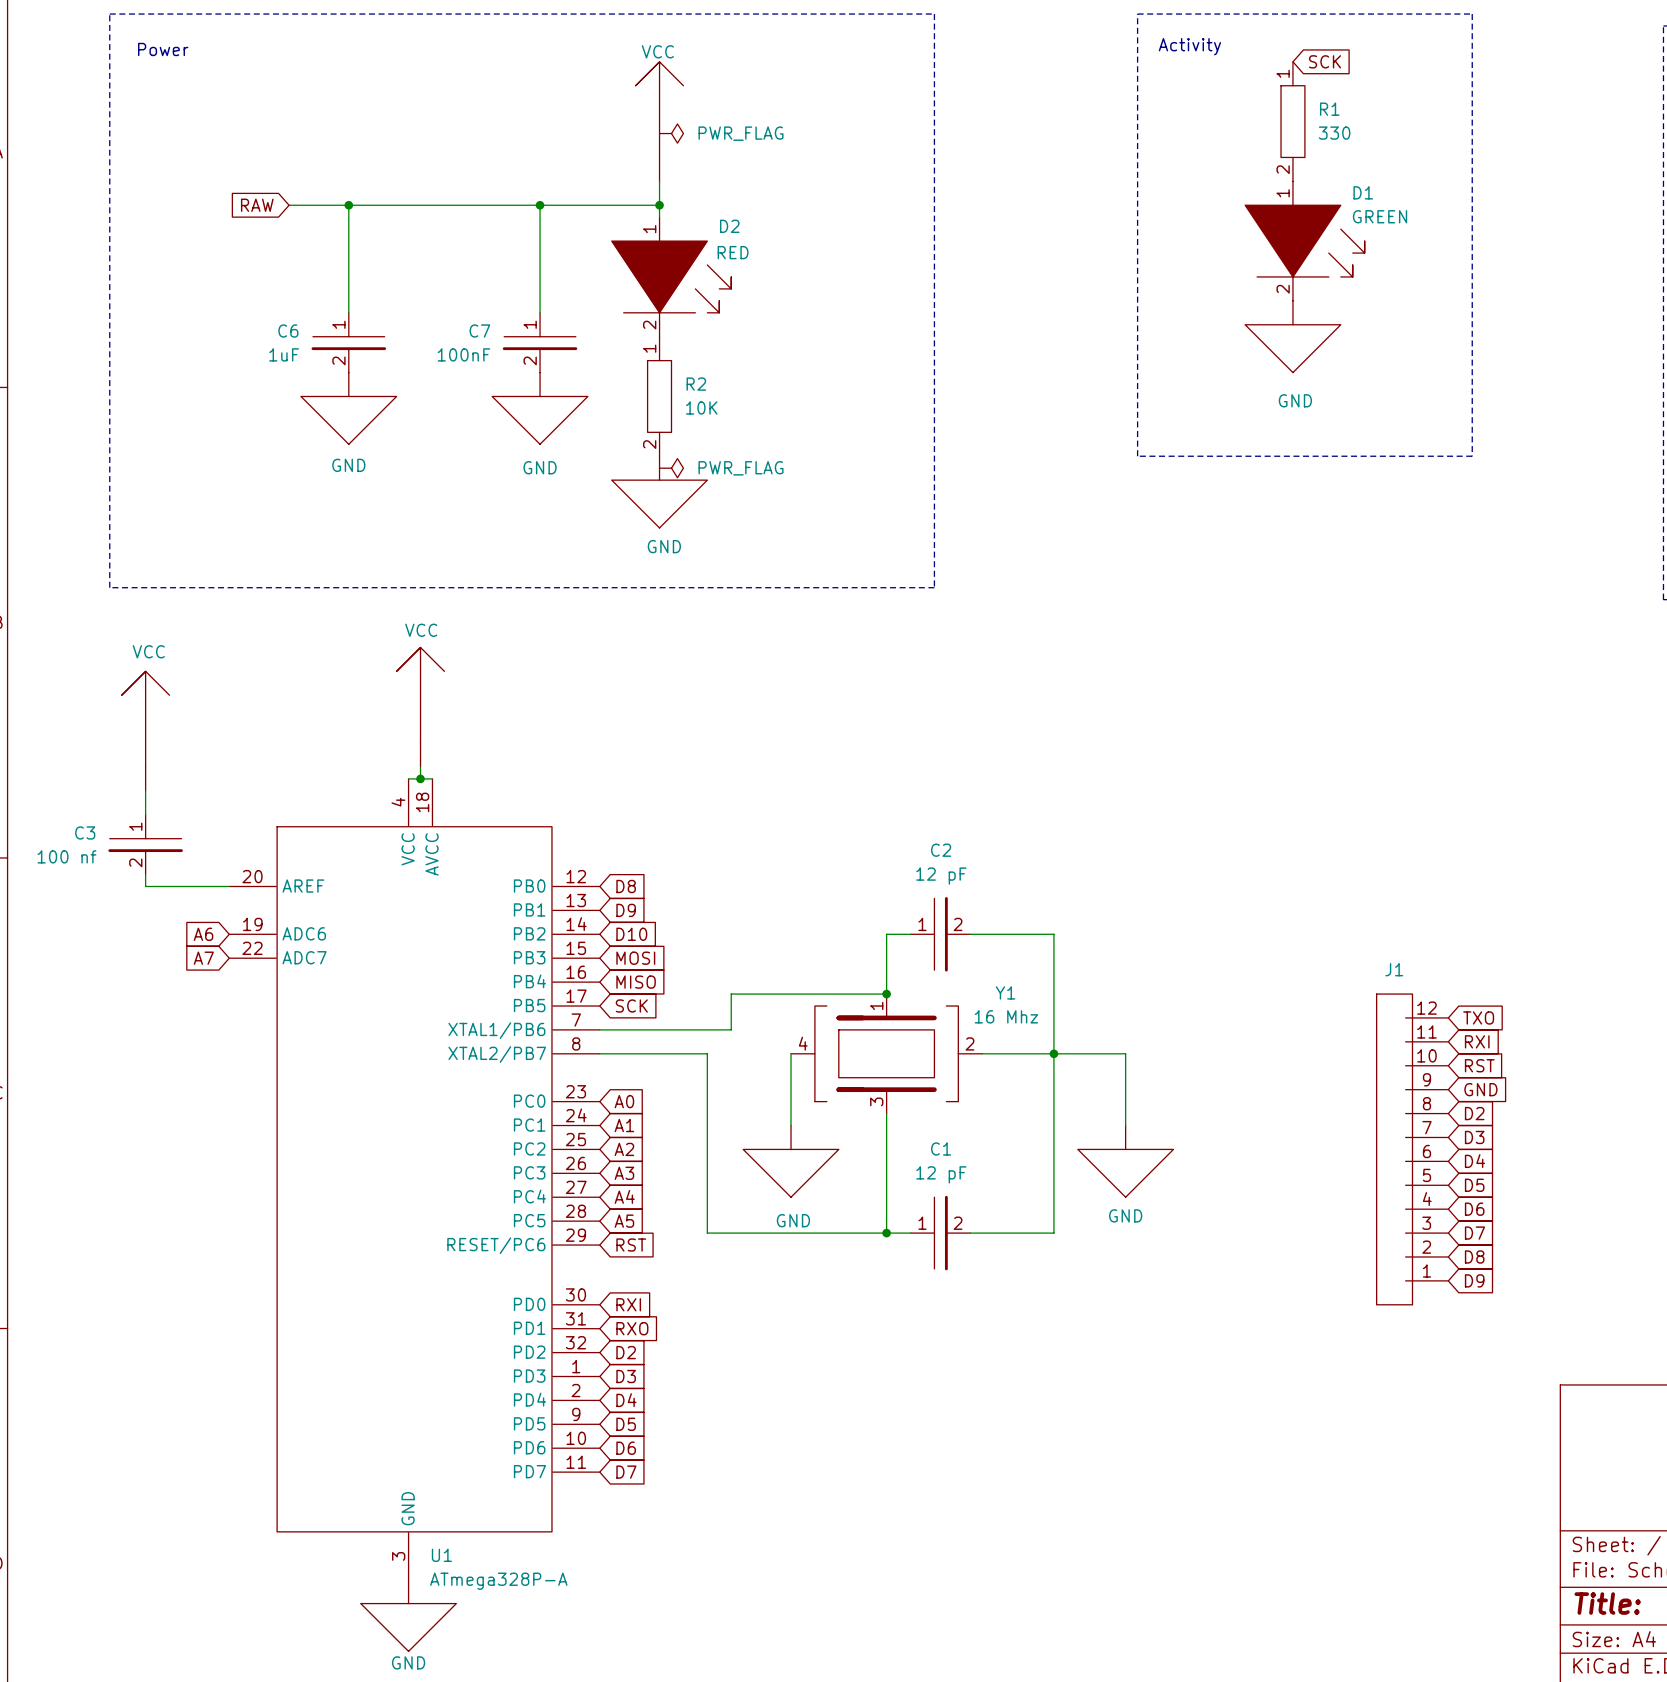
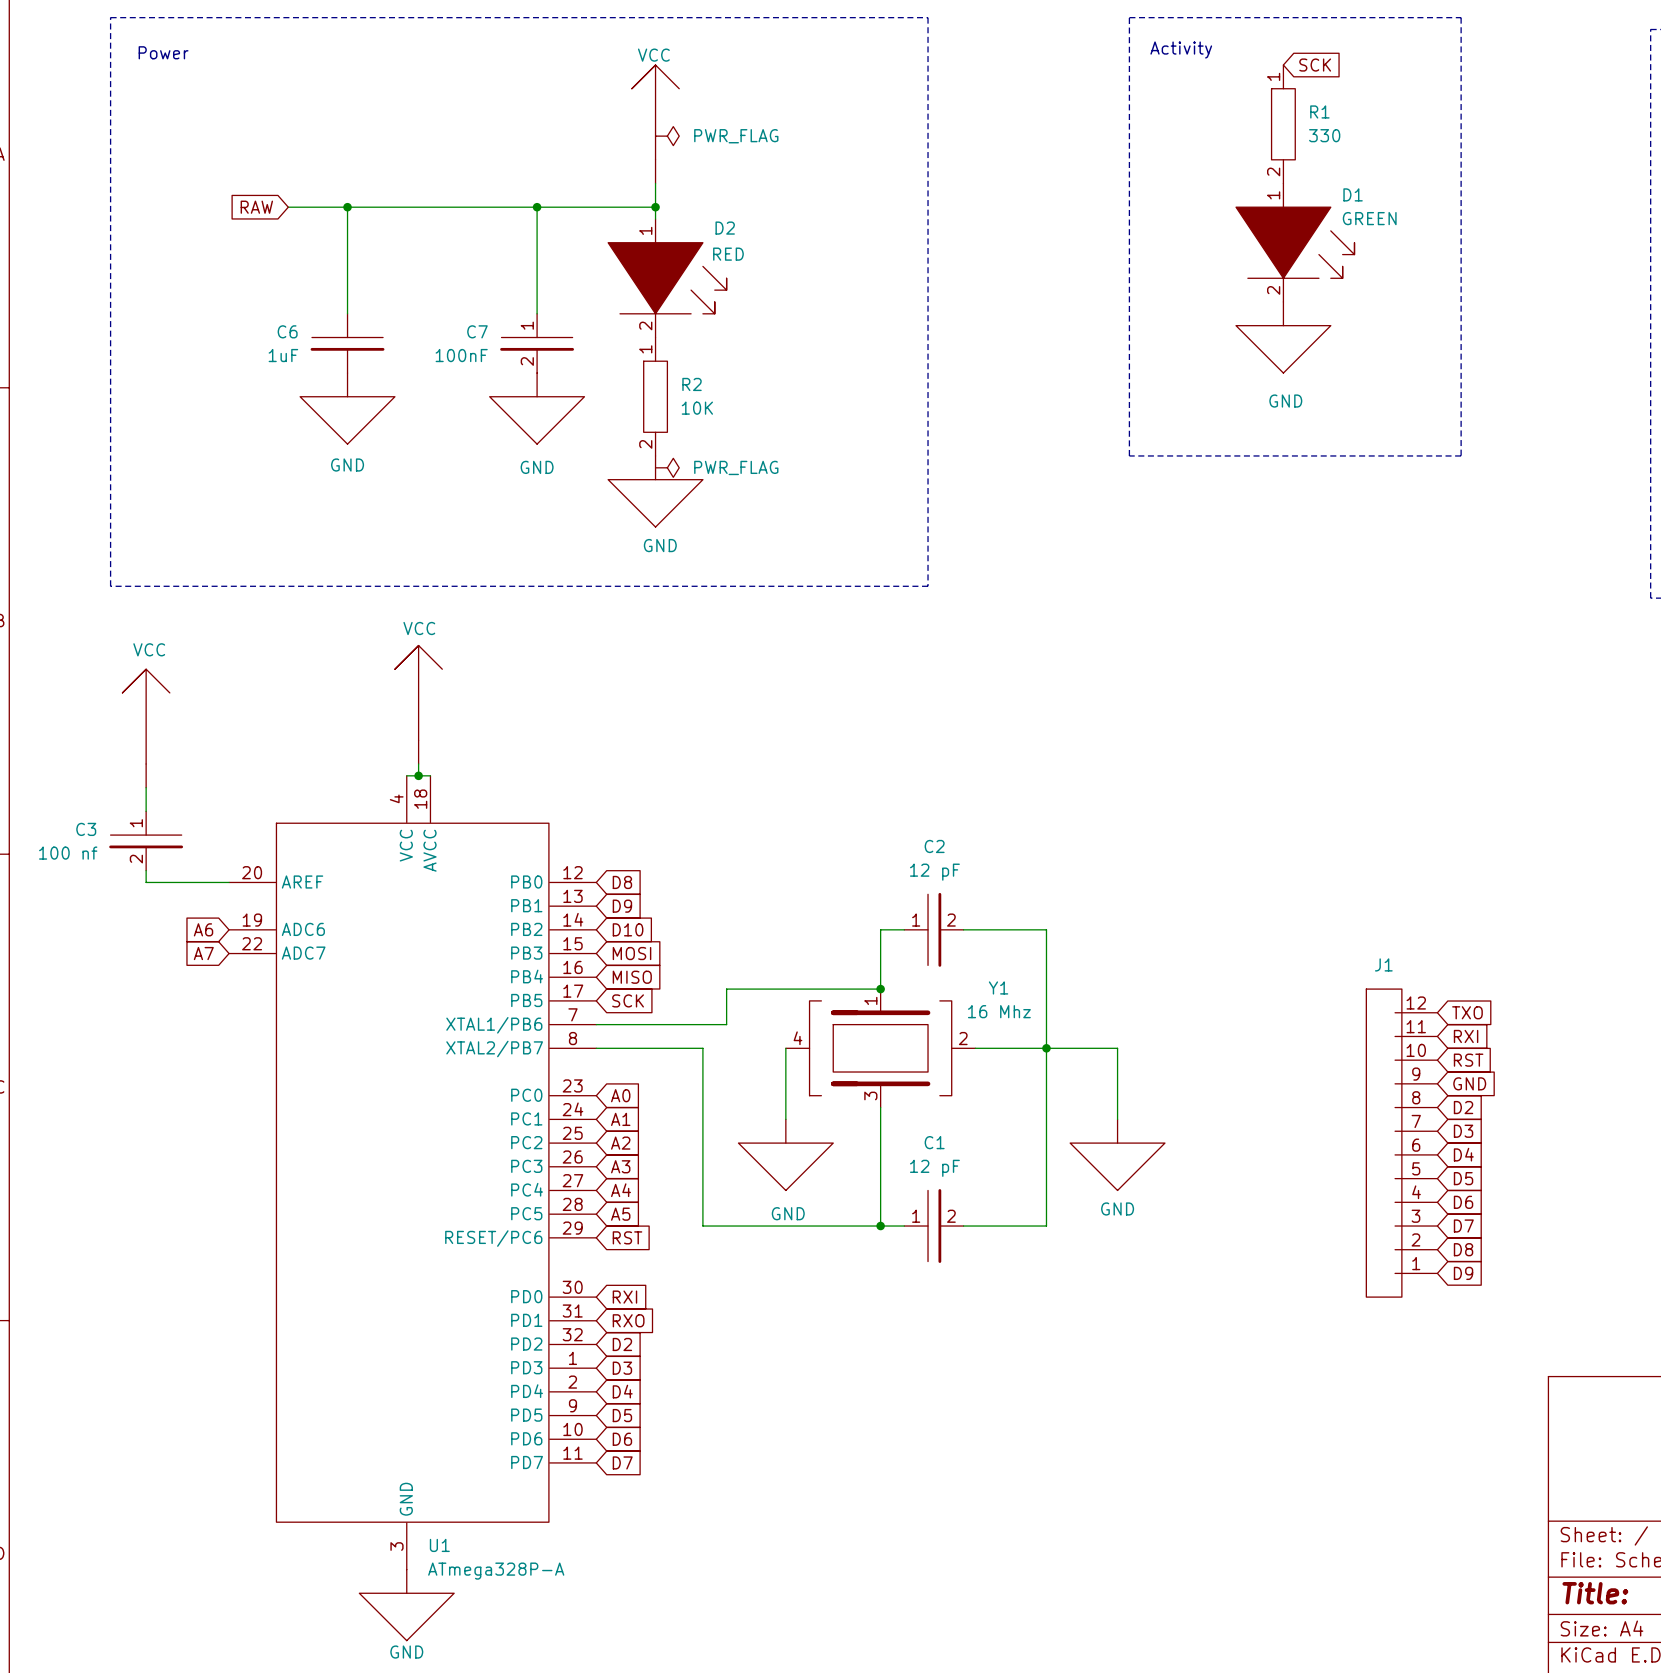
C6 pin number: 1 (338, 324) -> none
C6 pin number: 2 (338, 360) -> none

